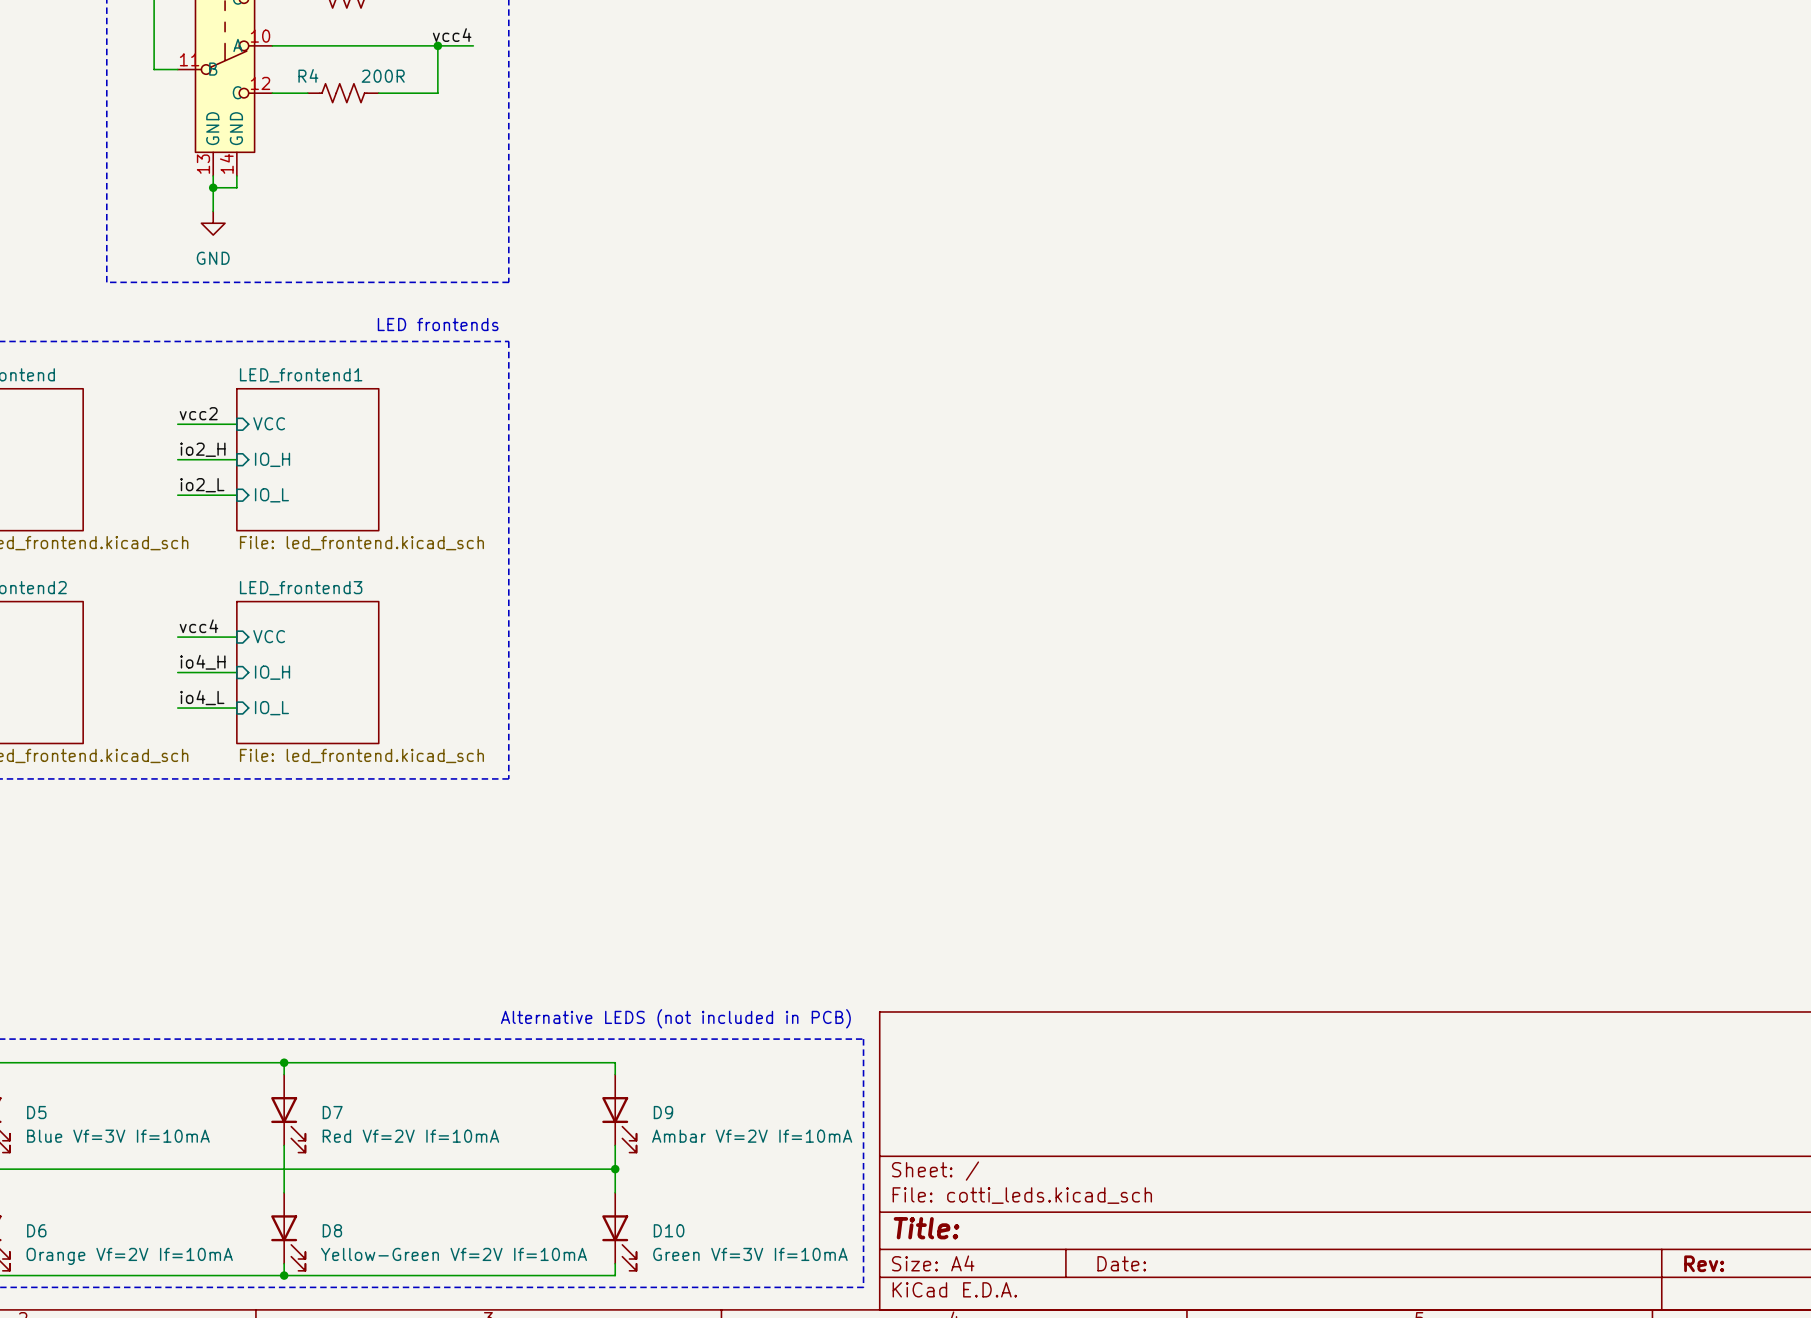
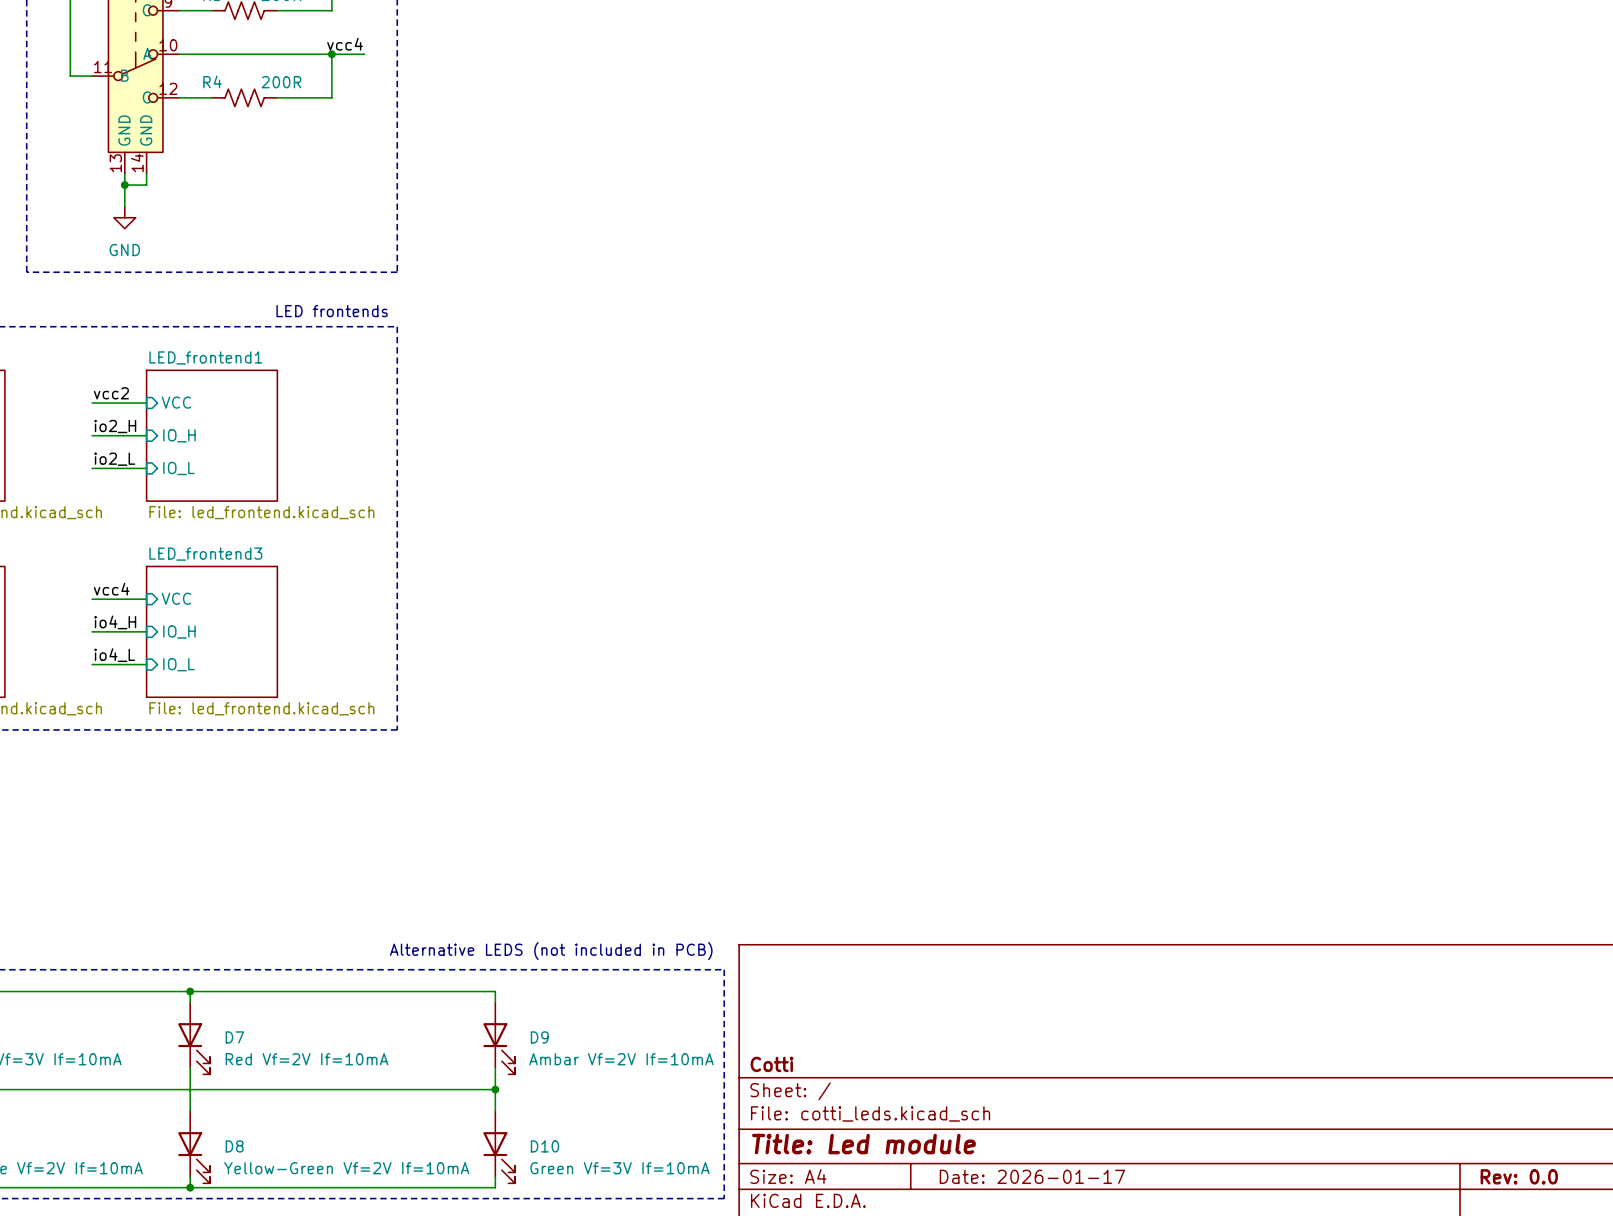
title block: none -> Cotti (772, 1064)
title block: Title: (926, 1228) -> Title: Led module (863, 1144)
title block: Date: (1121, 1263) -> Date: 2026-01-17 (1032, 1176)
title block: Rev: (1704, 1263) -> Rev: 0.0 (1519, 1176)

